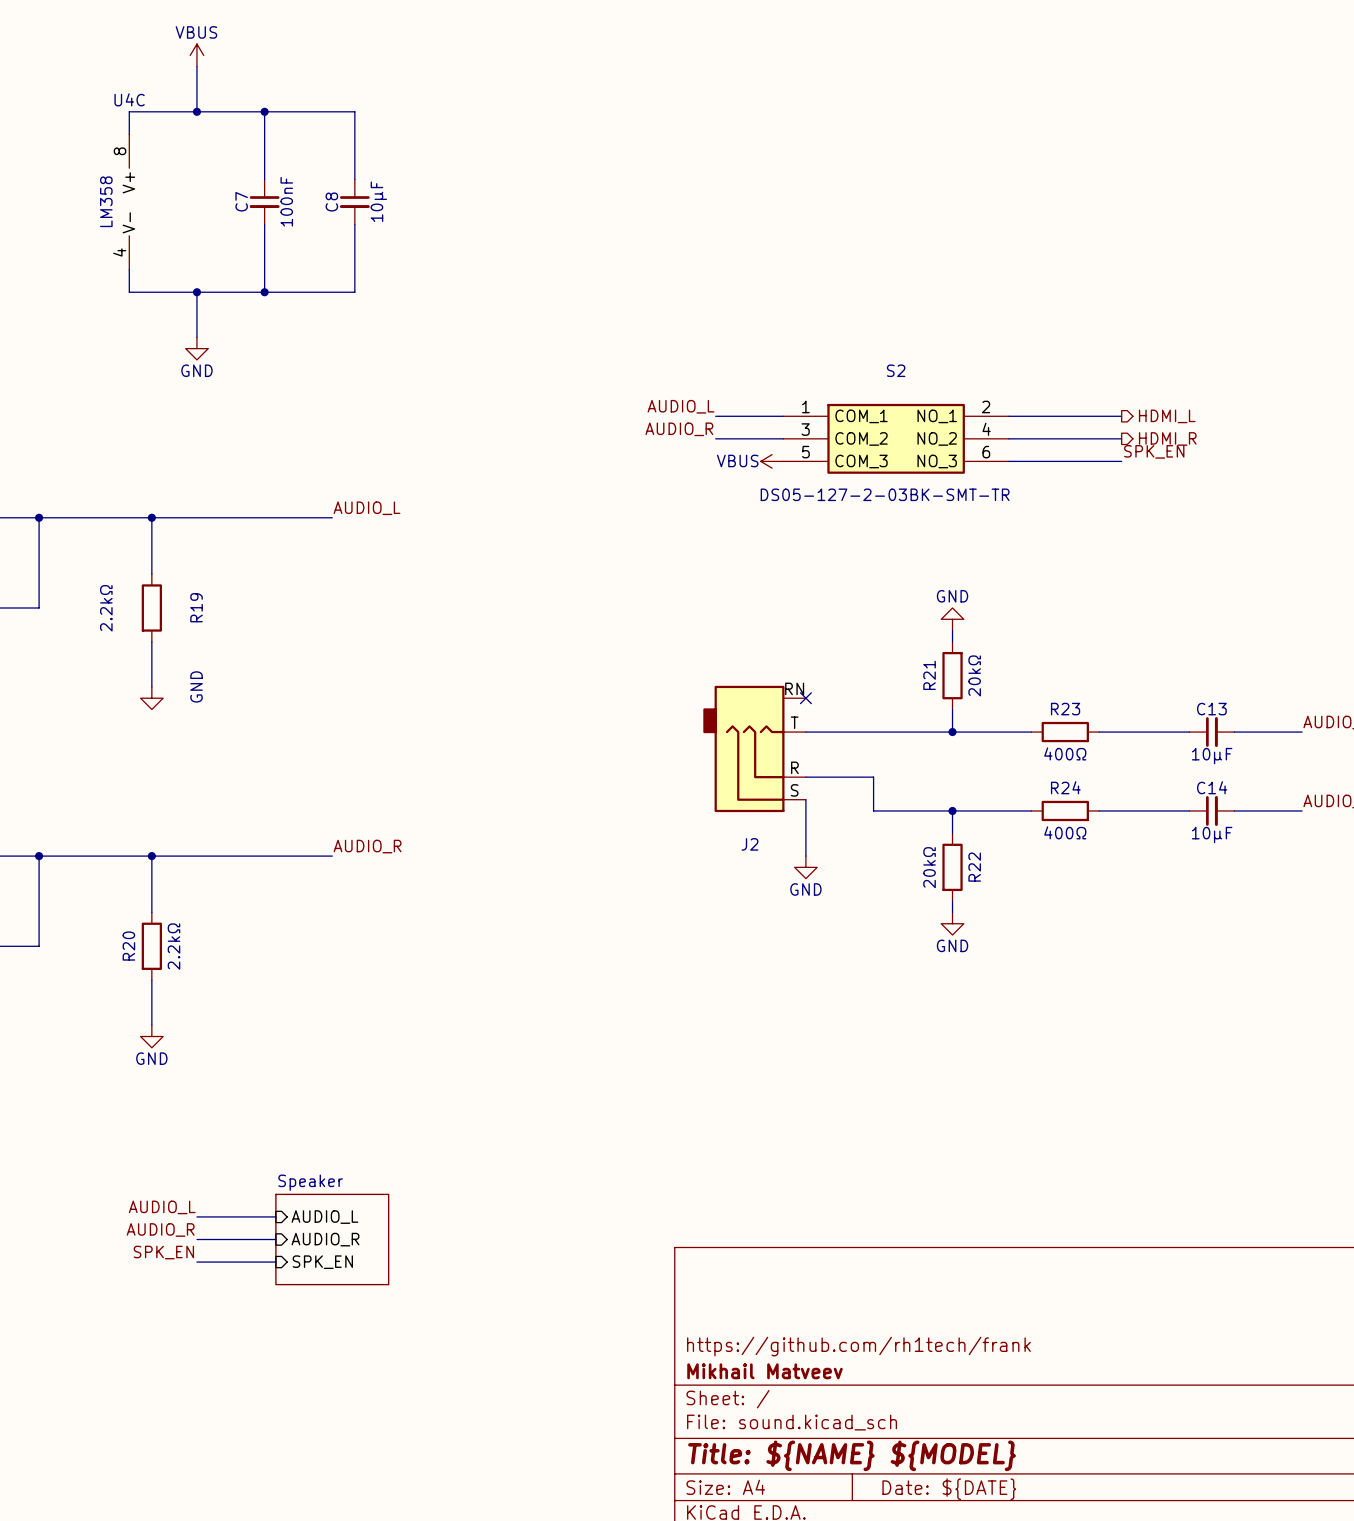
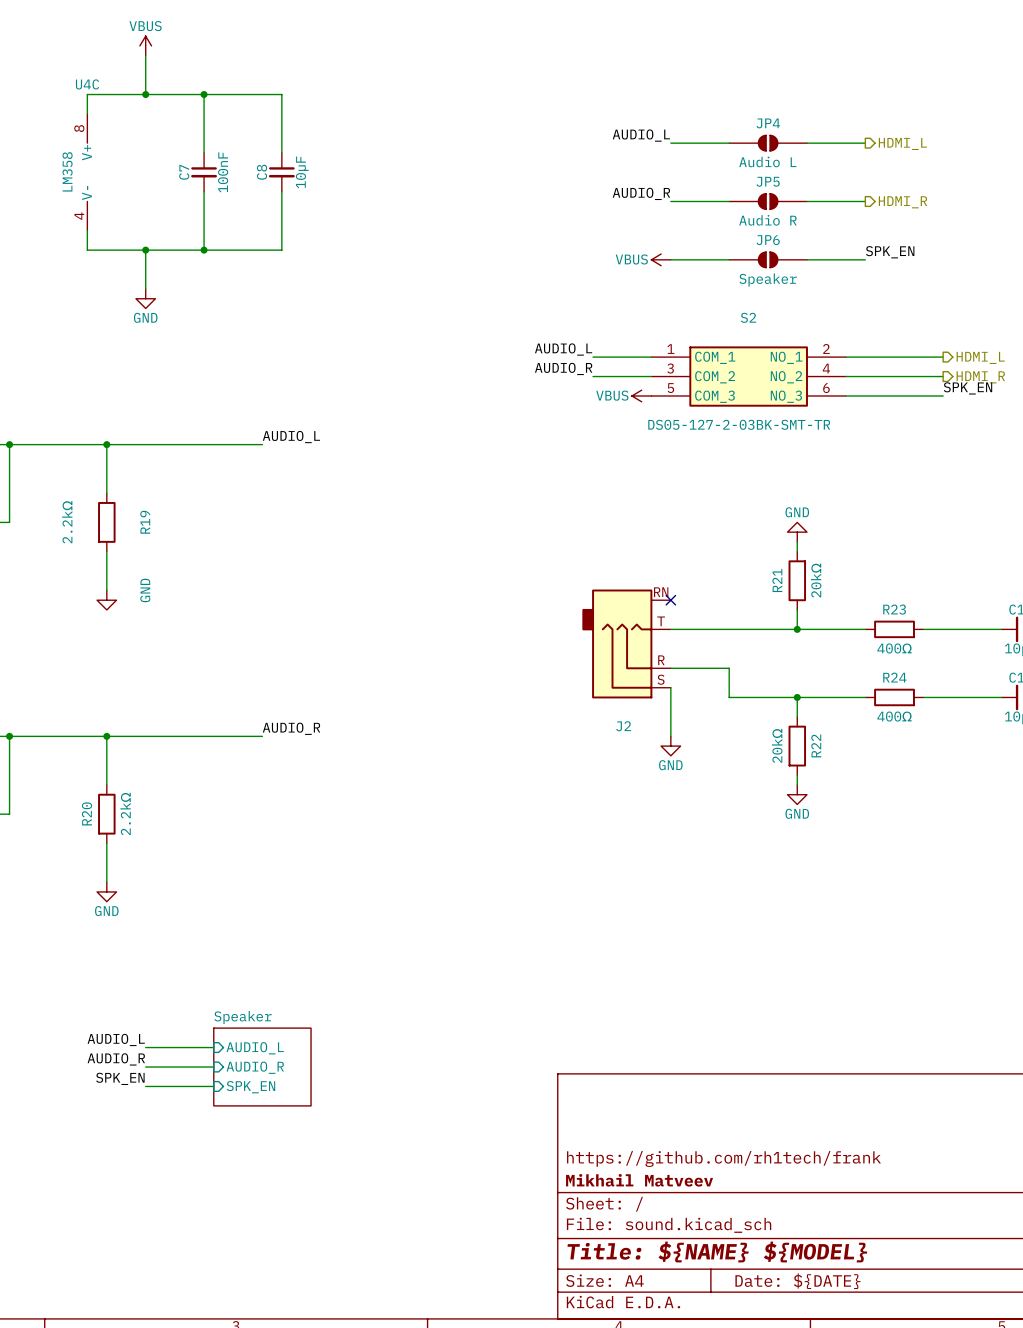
label: none -> AUDIO_L (641, 135)
wire: none -> (670, 143) (729, 143)
JP4: none -> Audio L (768, 143)
wire: none -> (806, 143) (865, 143)
hierarchical label: none -> HDMI_L (902, 143)
label: none -> AUDIO_R (641, 193)
wire: none -> (670, 201) (729, 201)
JP5: none -> Audio R (768, 201)
wire: none -> (806, 201) (865, 201)
hierarchical label: none -> HDMI_R (902, 202)
label: none -> SPK_EN (890, 252)
power symbol: none -> VBUS (661, 259)
wire: none -> (670, 259) (729, 259)
JP6: none -> Speaker (768, 259)
wire: none -> (806, 259) (865, 259)

